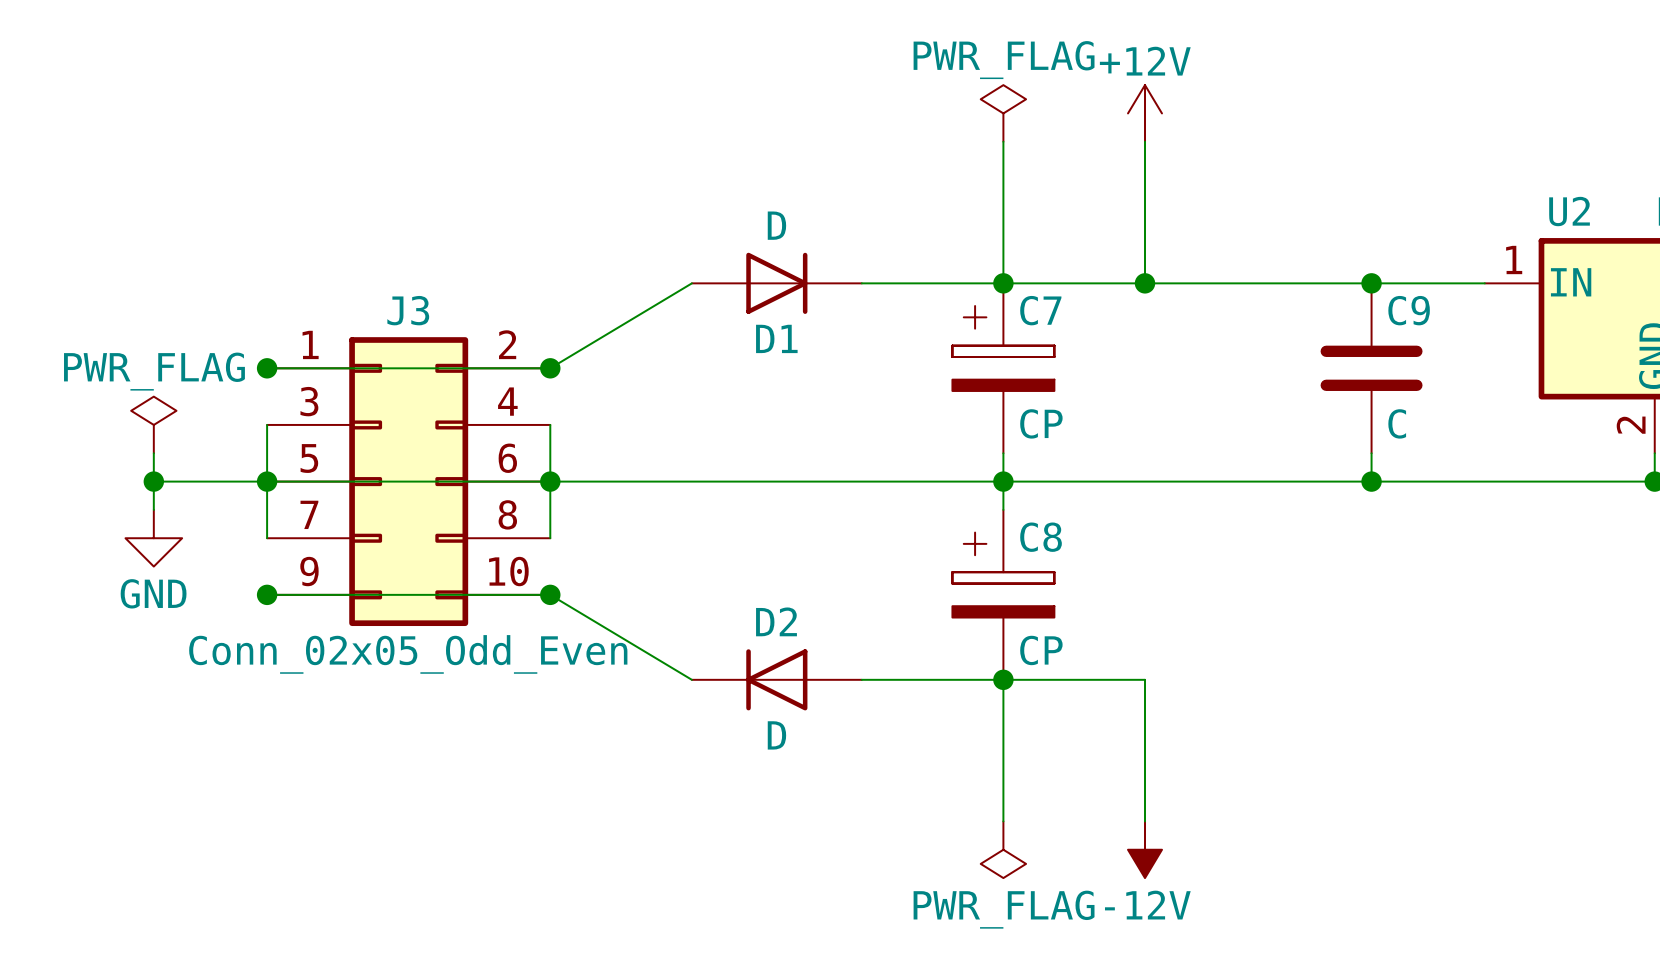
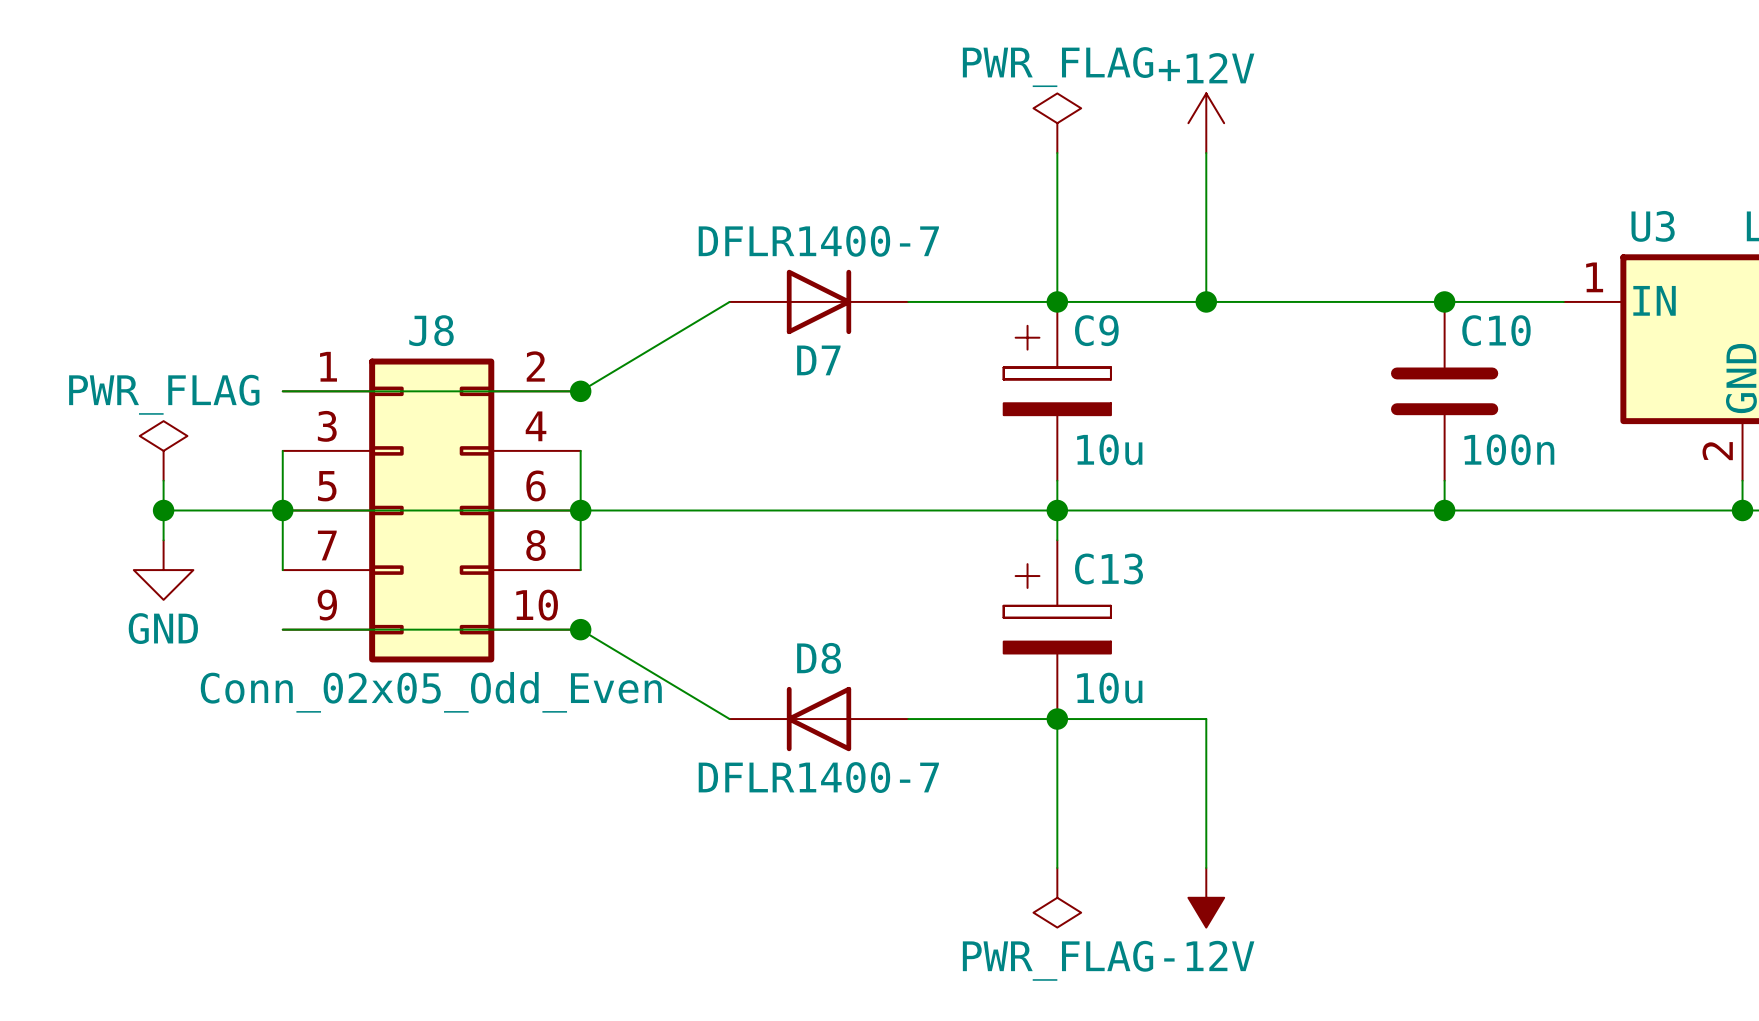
U2 name: U2 (1569, 211) -> U3 (1653, 226)
D1 value: D (776, 225) -> DFLR1400-7 (818, 241)
J3 name: J3 (408, 310) -> J8 (431, 330)
C7 name: C7 (1040, 310) -> C9 (1096, 330)
C9 name: C9 (1409, 310) -> C10 (1496, 330)
D1 name: D1 (776, 338) -> D7 (818, 360)
junction: (267, 368) -> none
C7 value: CP (1041, 423) -> 10u (1109, 449)
C9 value: C (1397, 423) -> 100n (1509, 449)
C8 name: C8 (1041, 537) -> C13 (1108, 568)
junction: (267, 594) -> none
D2 name: D2 (776, 621) -> D8 (819, 658)
C8 value: CP (1041, 650) -> 10u (1109, 688)
D2 value: D (776, 735) -> DFLR1400-7 (818, 777)

